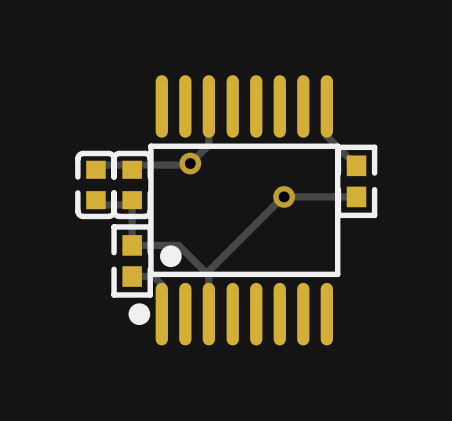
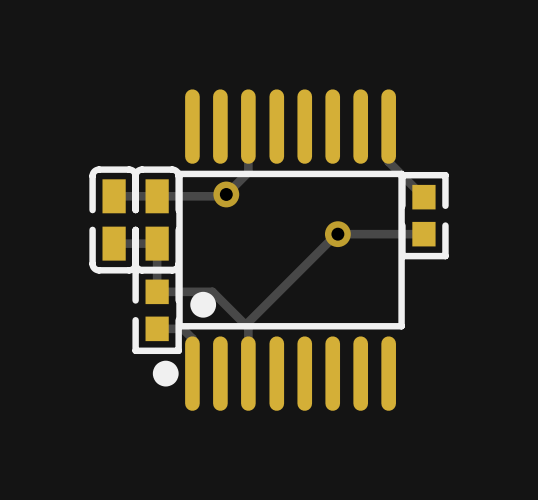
part footprint: [75, 150, 117, 220] -> [89, 166, 139, 274]
part footprint: [111, 150, 153, 220] -> [132, 166, 182, 274]

